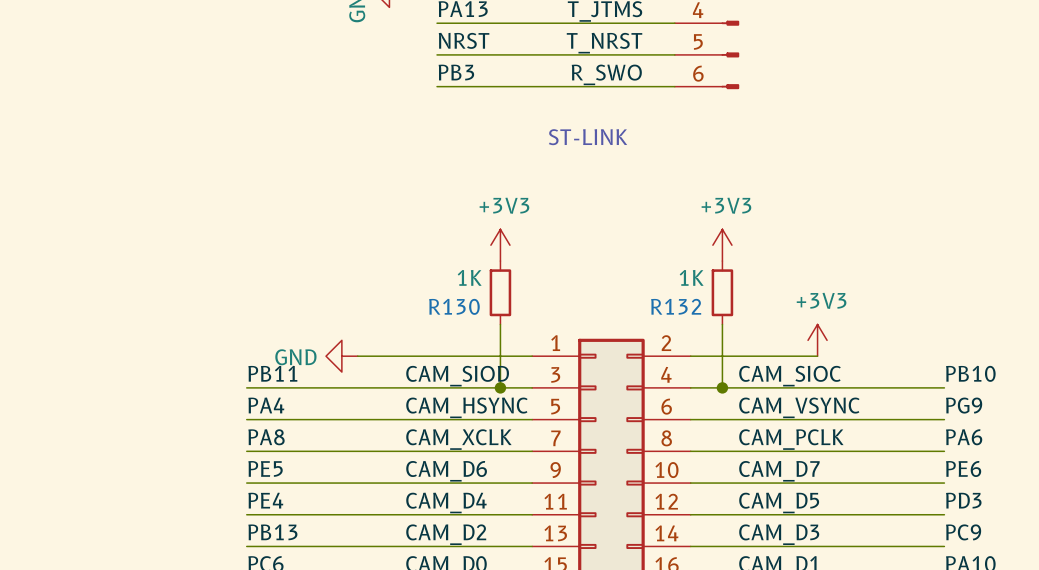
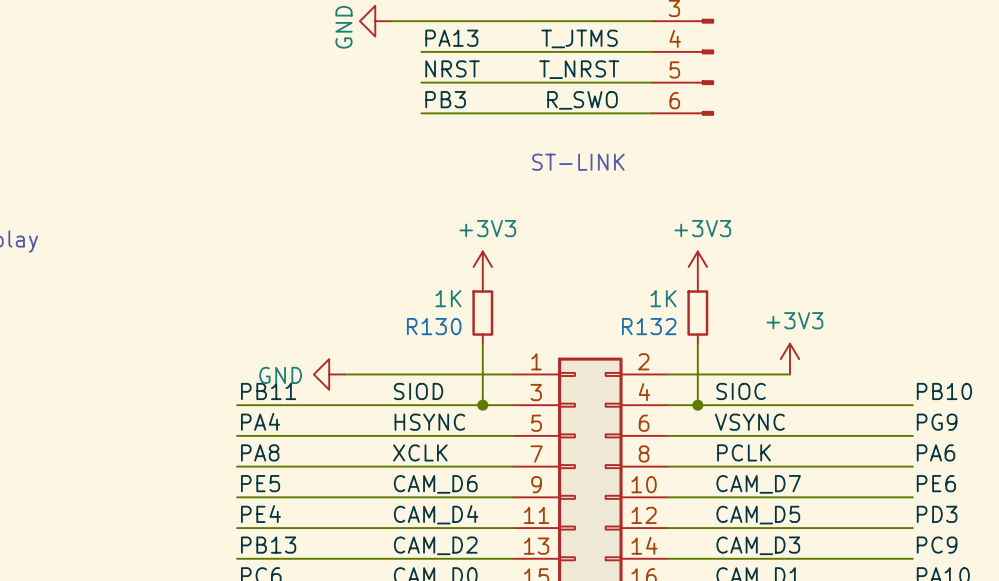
label: CAM_SIOD (457, 376) -> SIOD (418, 391)
label: CAM_SIOC (789, 376) -> SIOC (741, 391)
label: CAM_HSYNC (466, 407) -> HSYNC (429, 422)
label: CAM_VSYNC (799, 407) -> VSYNC (749, 422)
label: CAM_XCLK (458, 439) -> XCLK (420, 452)
label: CAM_PCLK (791, 439) -> PCLK (744, 452)

